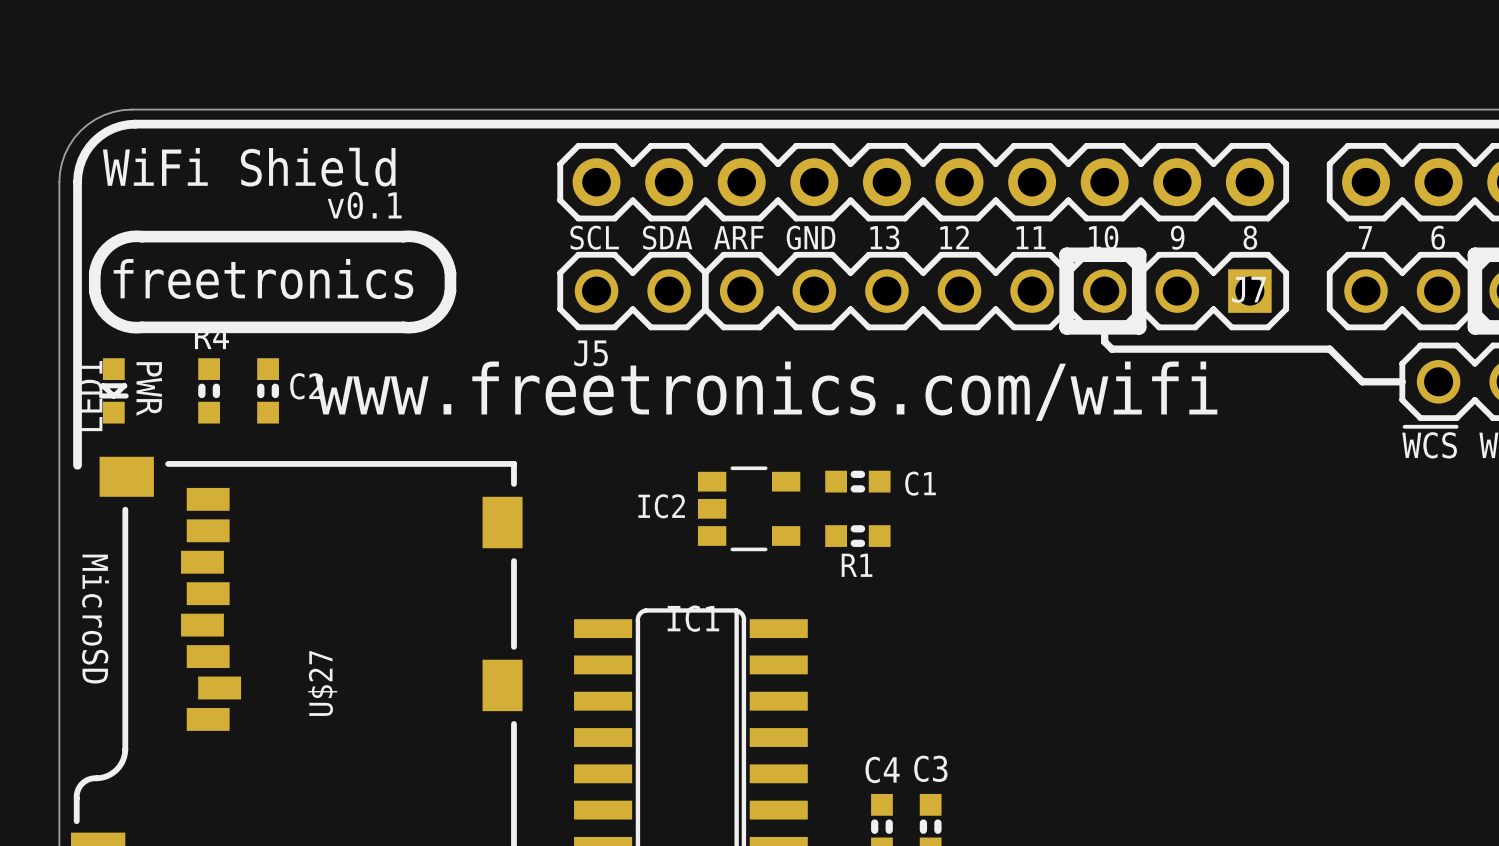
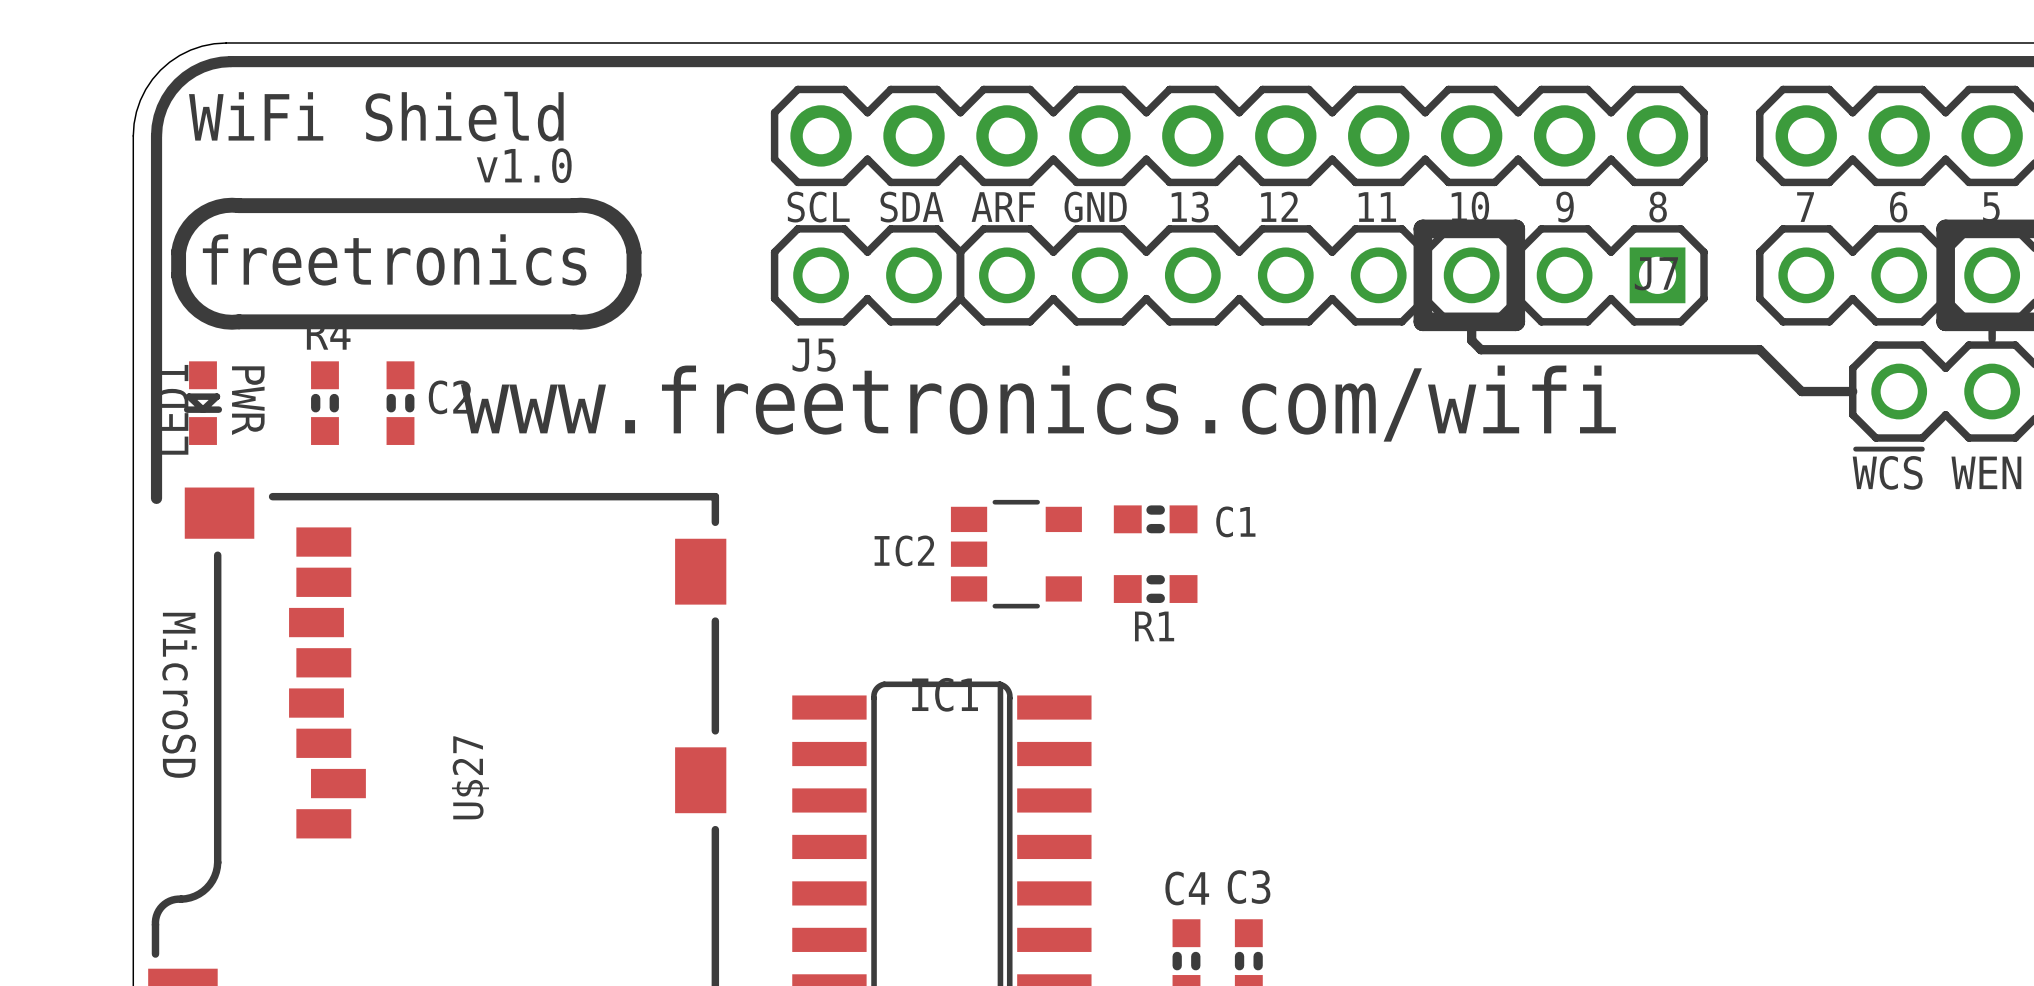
text: v0.1 (364, 205) -> v1.0 (524, 165)

